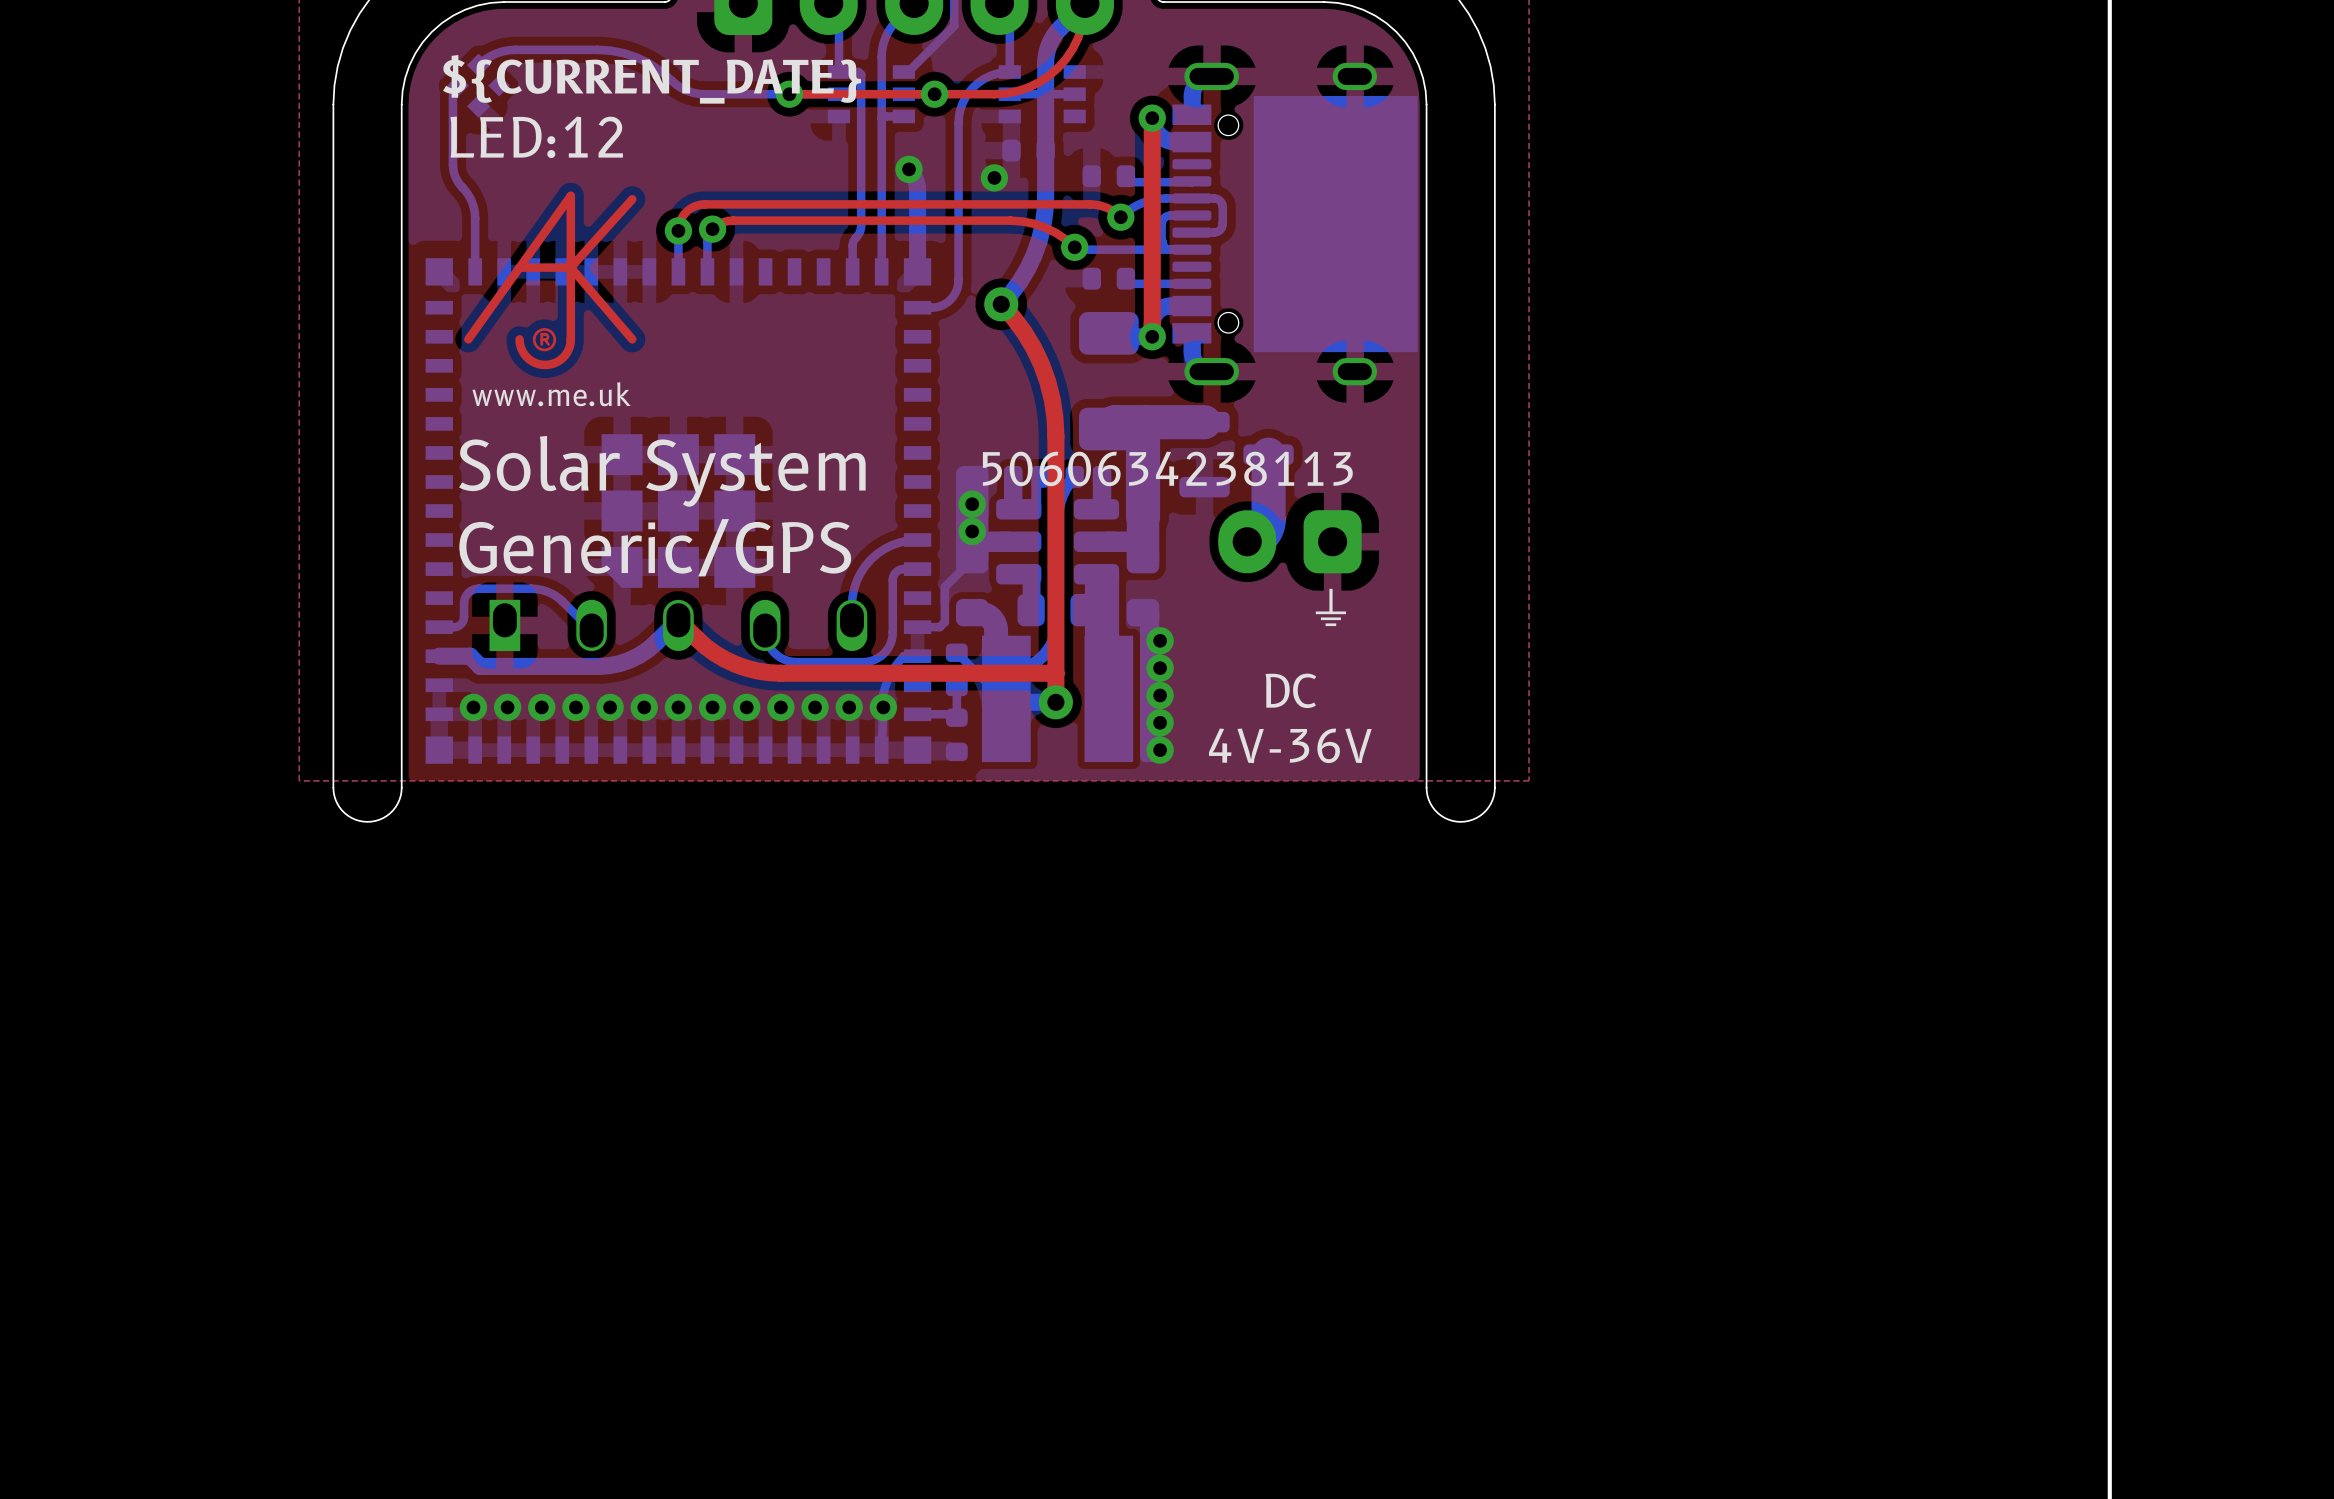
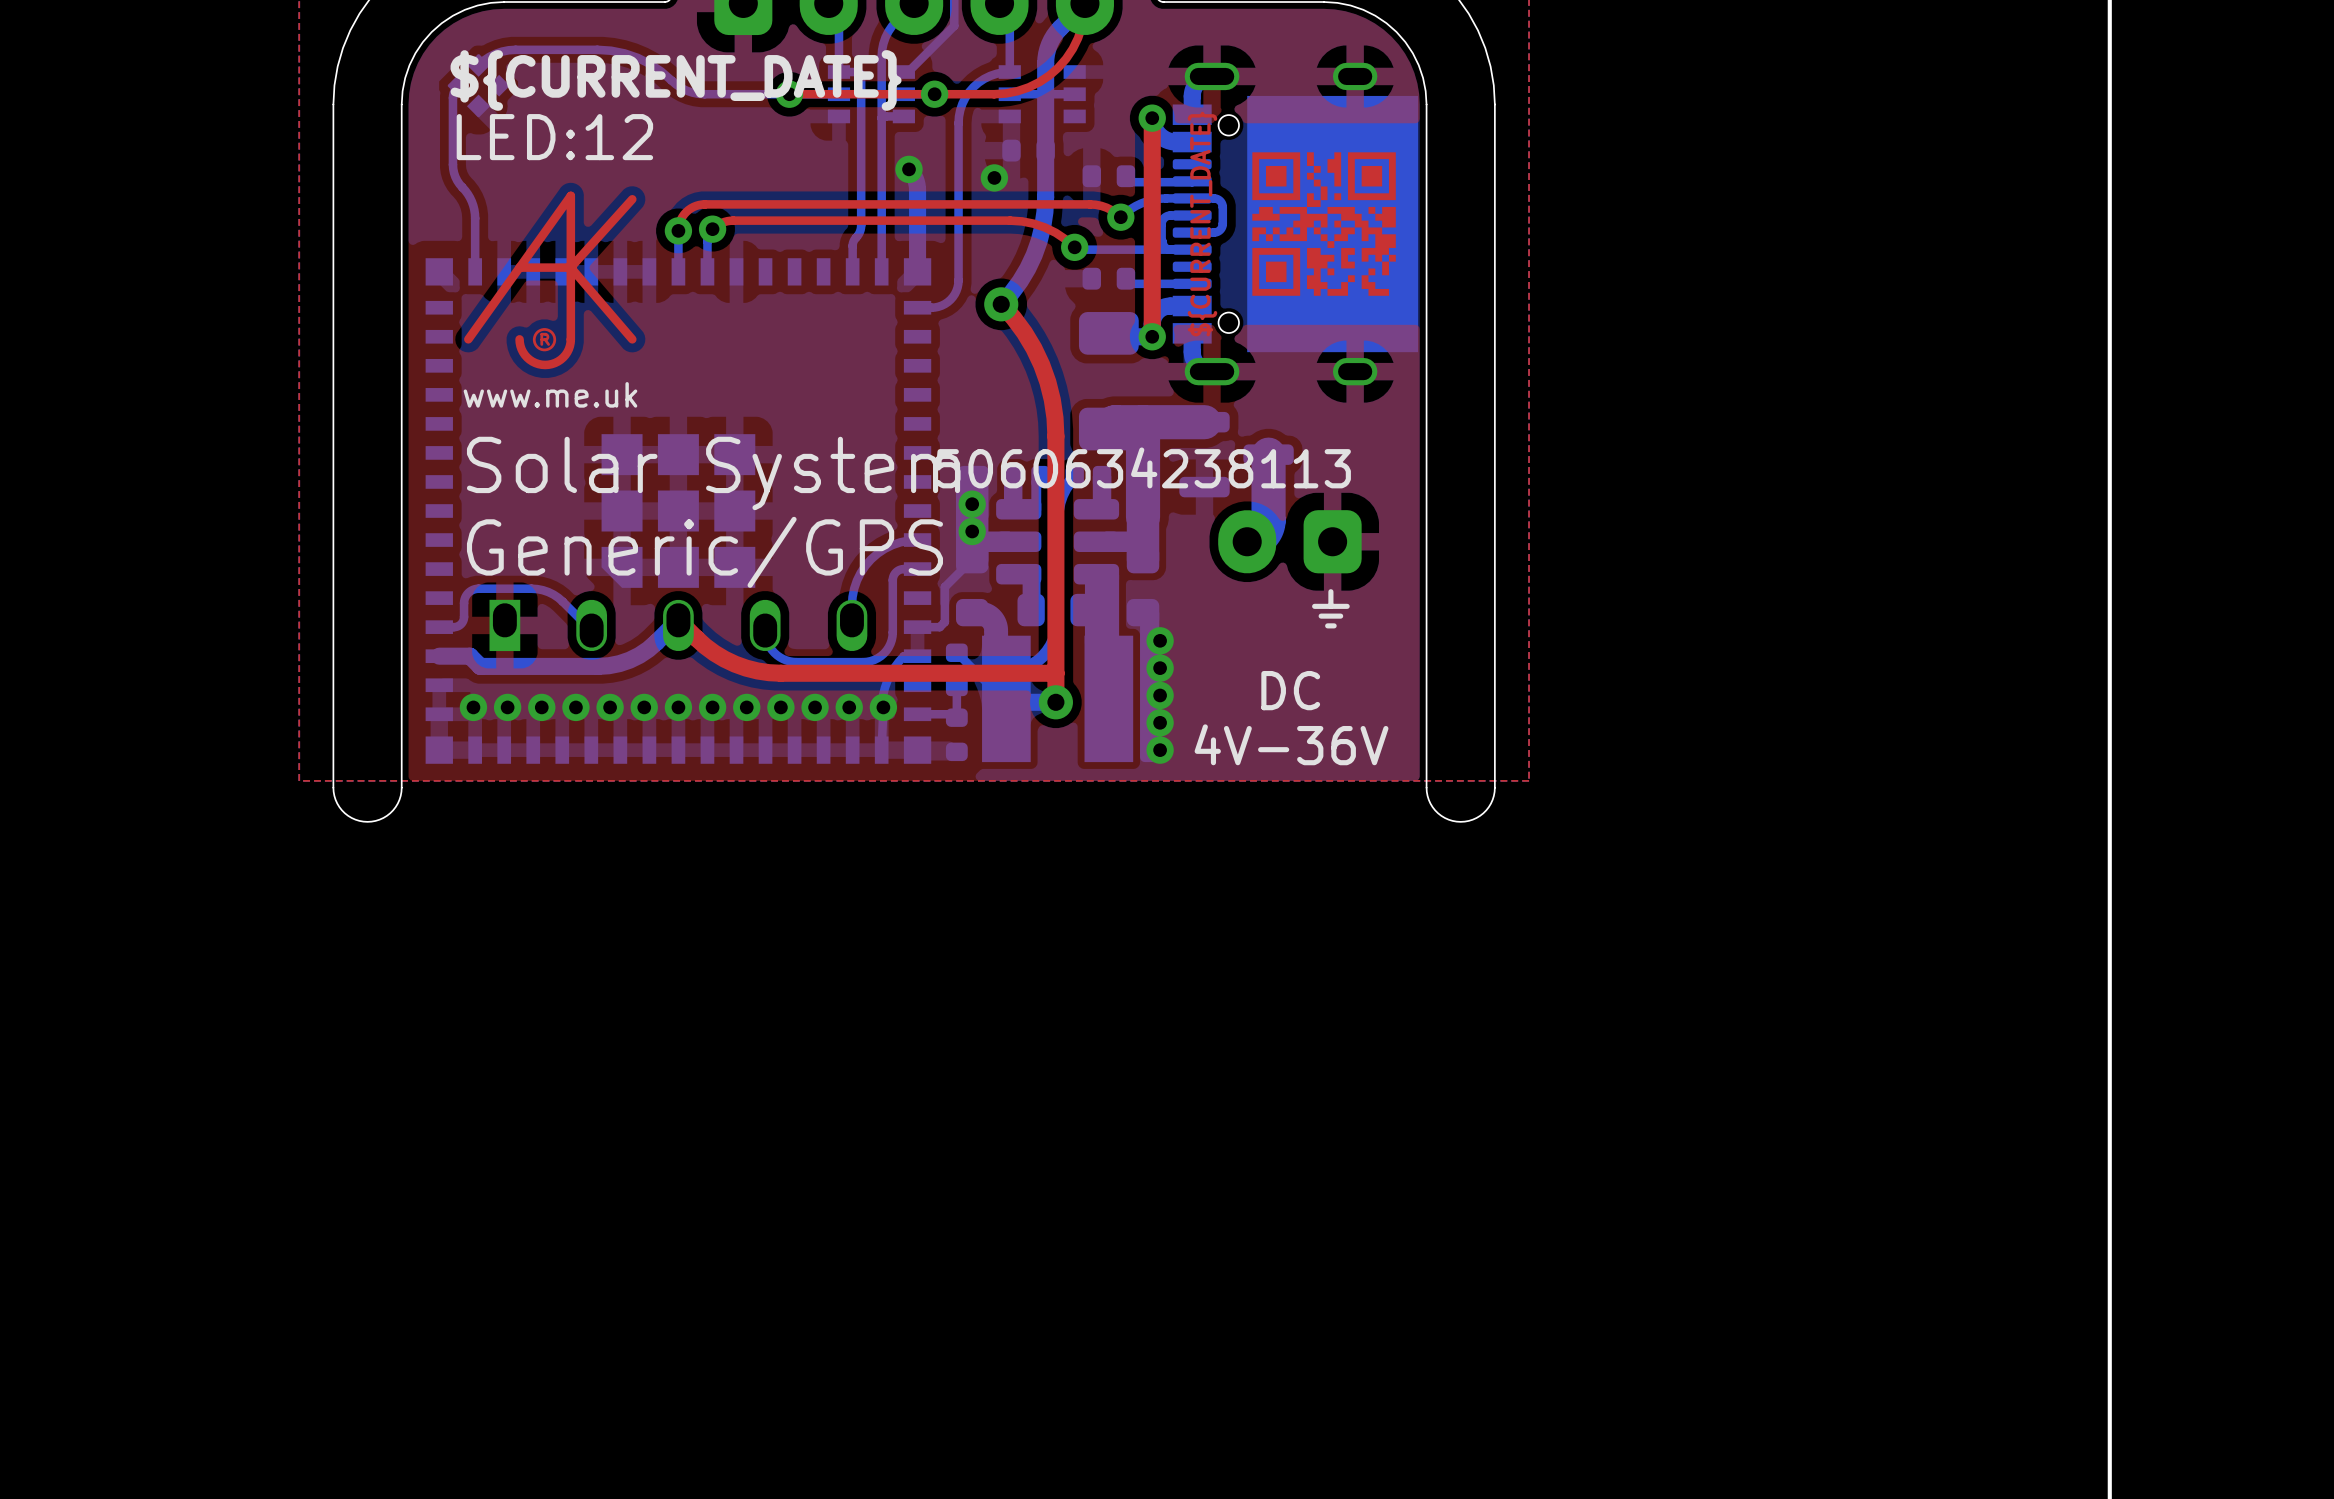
part footprint: [1172, 62, 1418, 386] -> [1172, 62, 1419, 386]
part: none -> (1324, 224)

